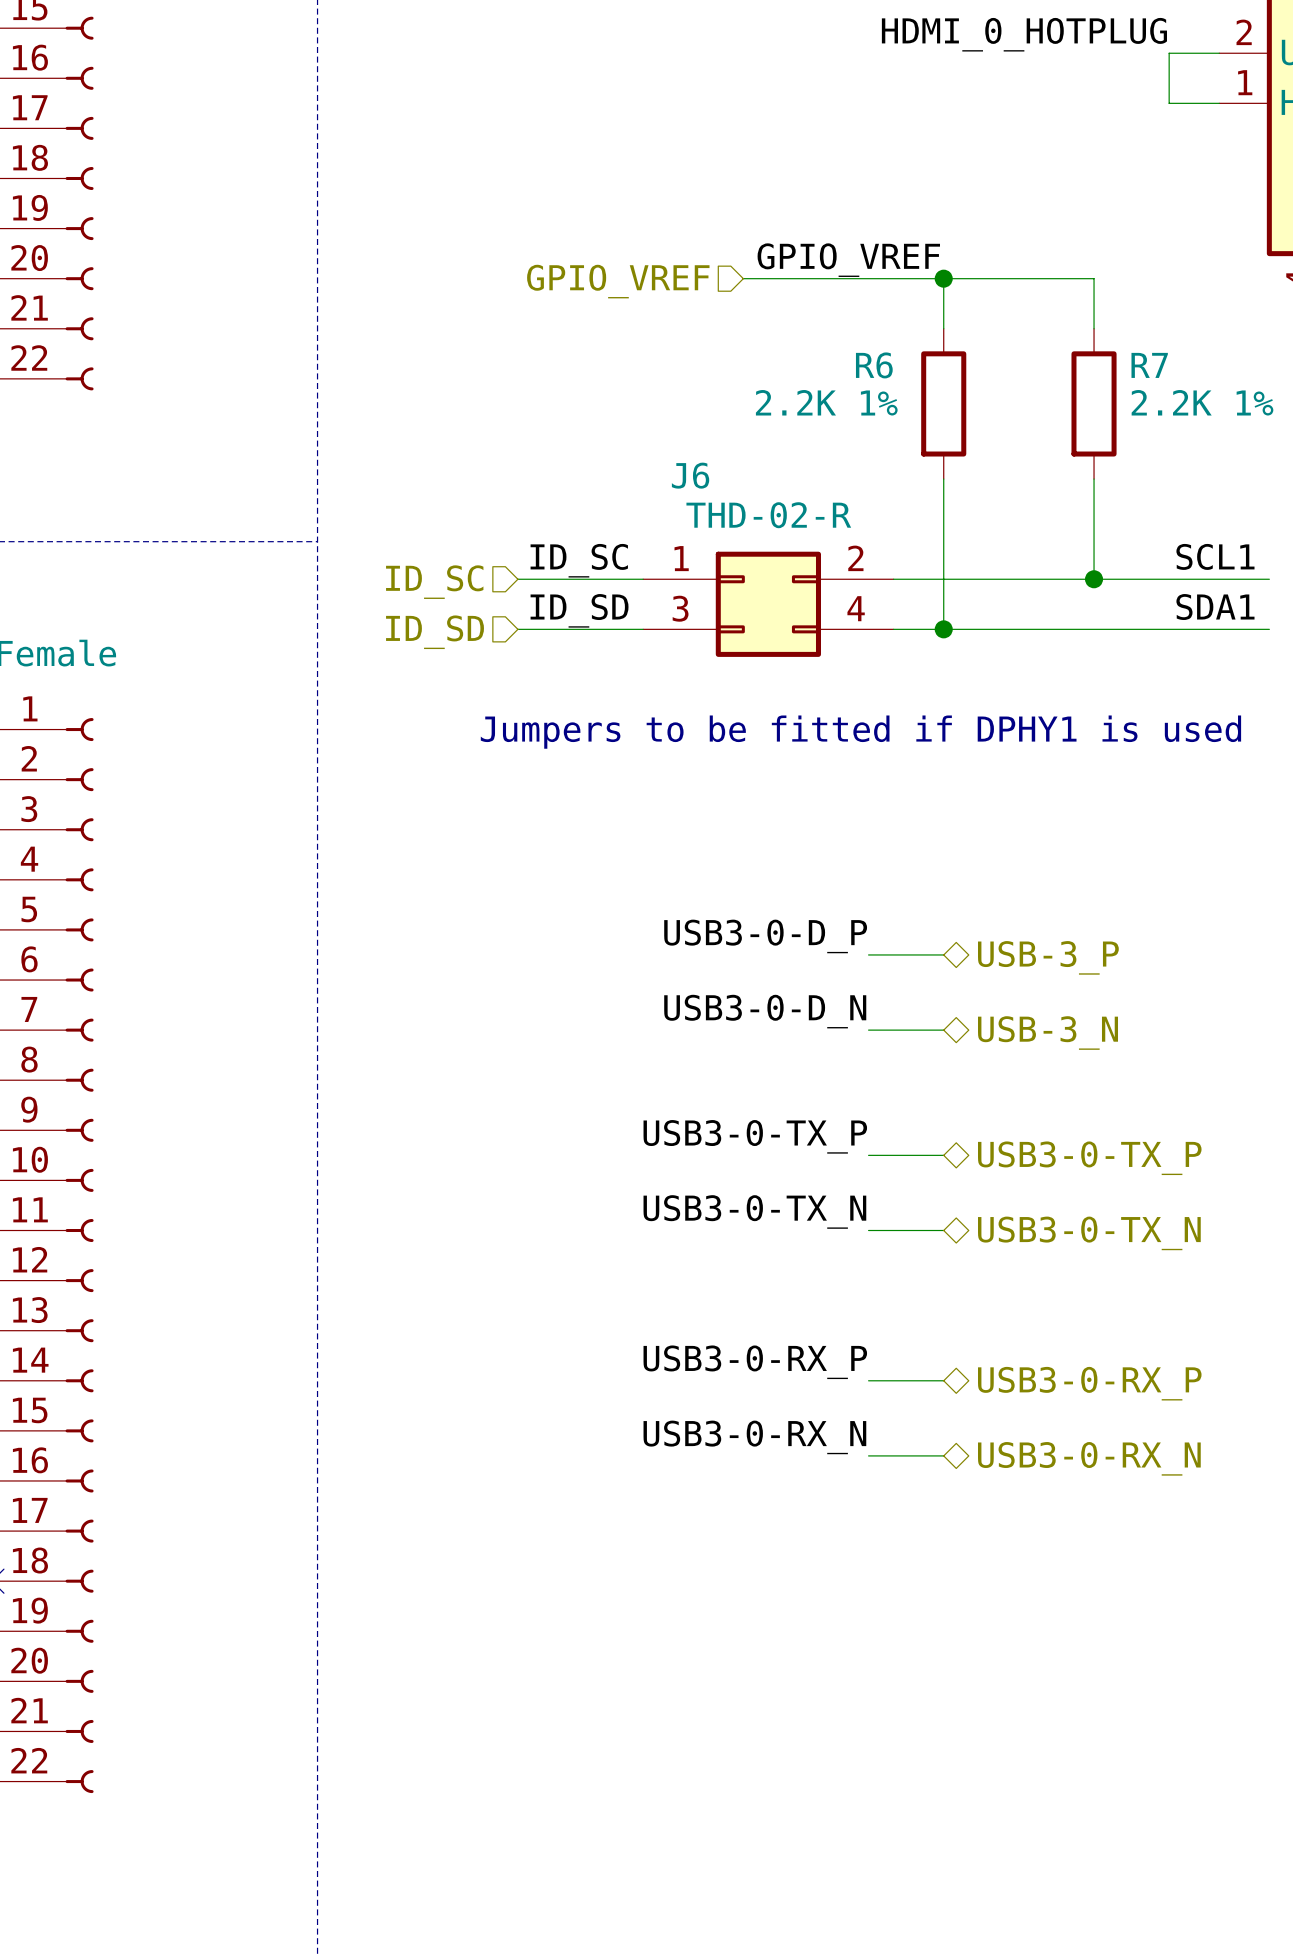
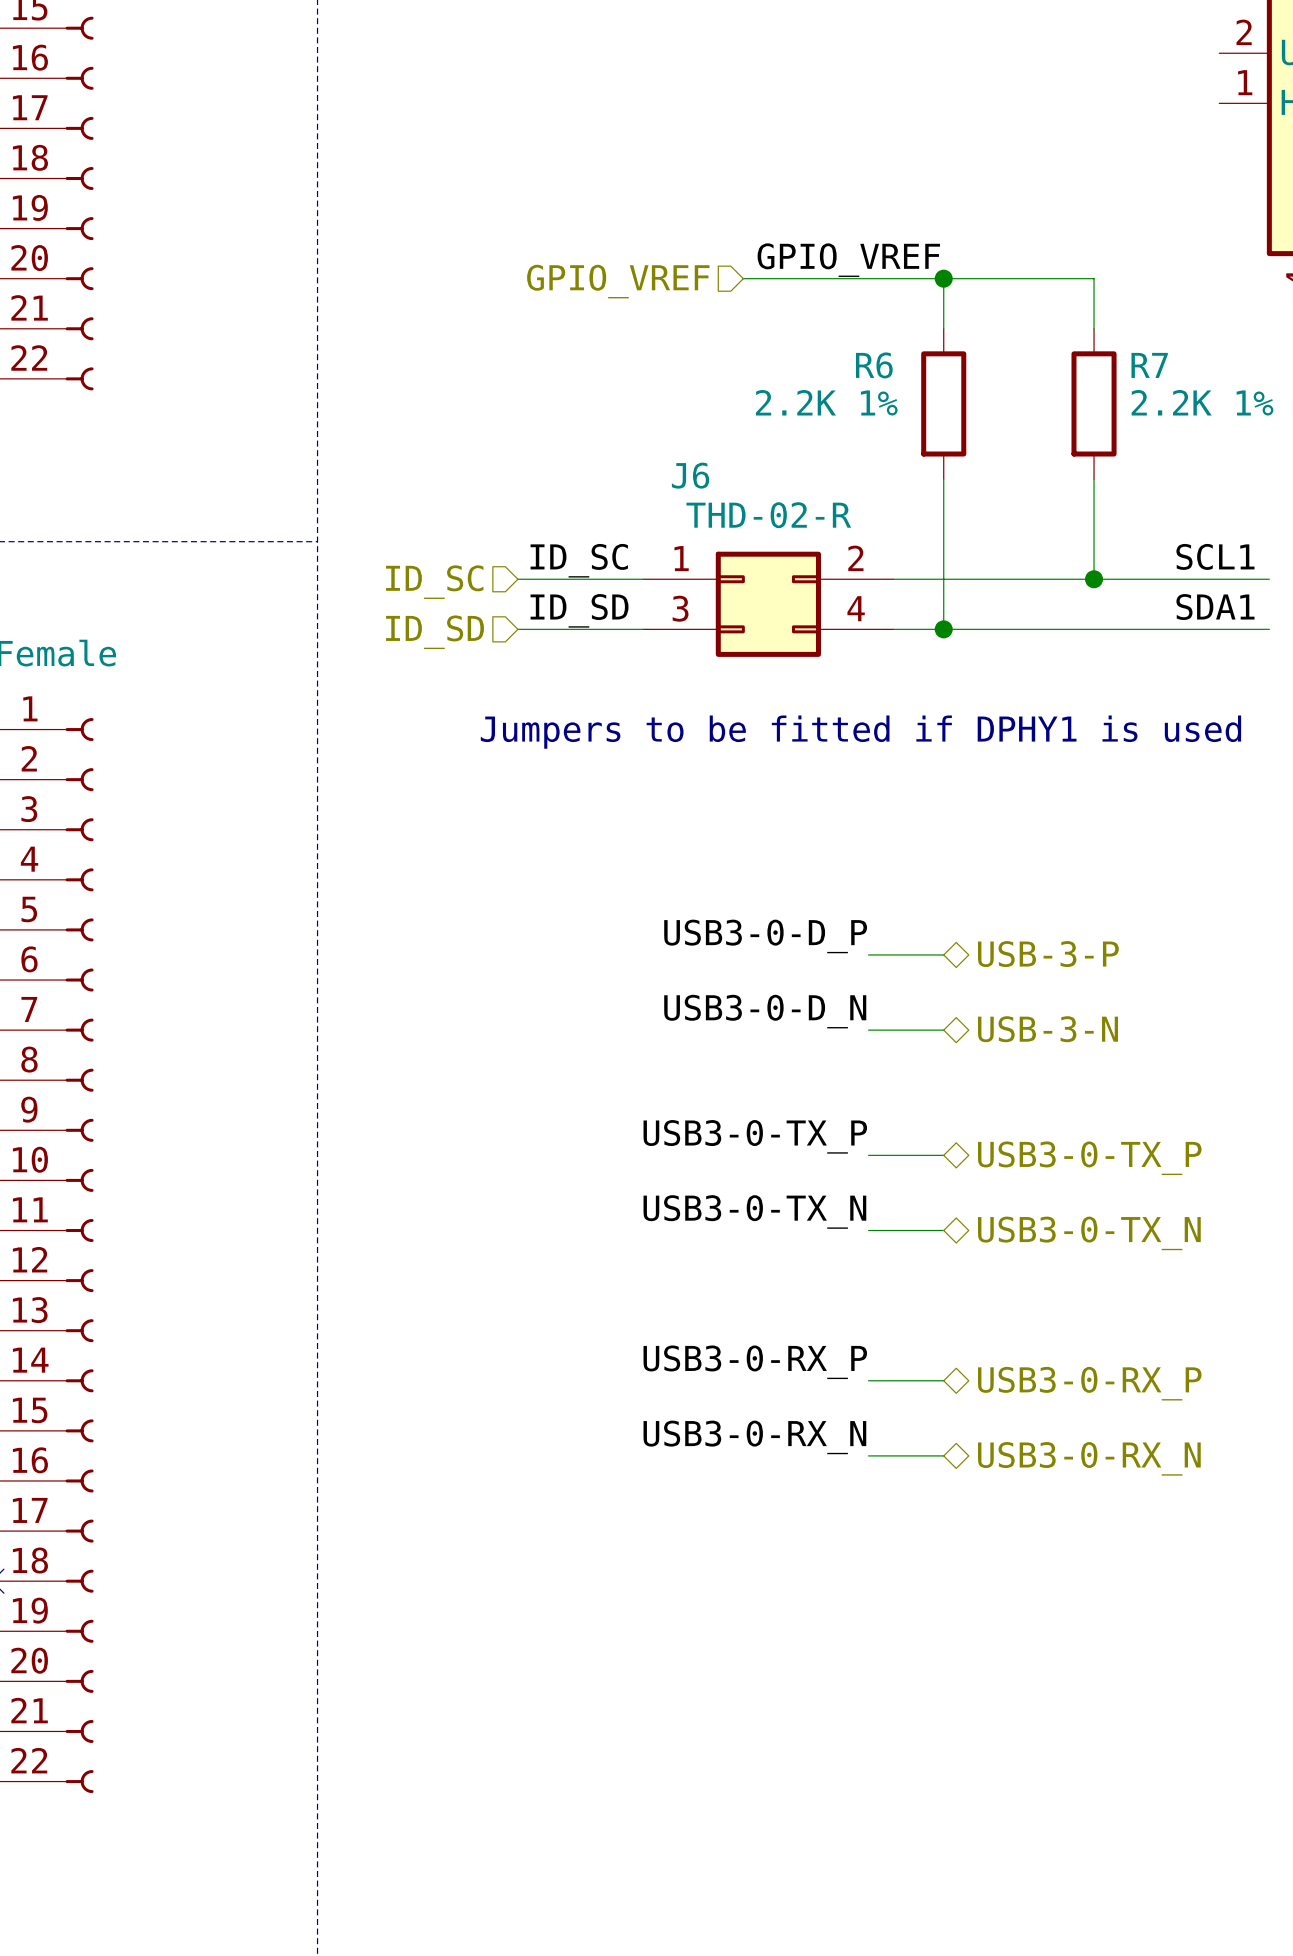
label: HDMI_0_HOTPLUG (1024, 34) -> none
wire: (1219, 53) (1169, 53) (1169, 103) (1219, 103) -> none
hierarchical label: USB-3_P (1048, 957) -> USB-3-P (1048, 954)
hierarchical label: USB-3_N (1048, 1033) -> USB-3-N (1048, 1029)

